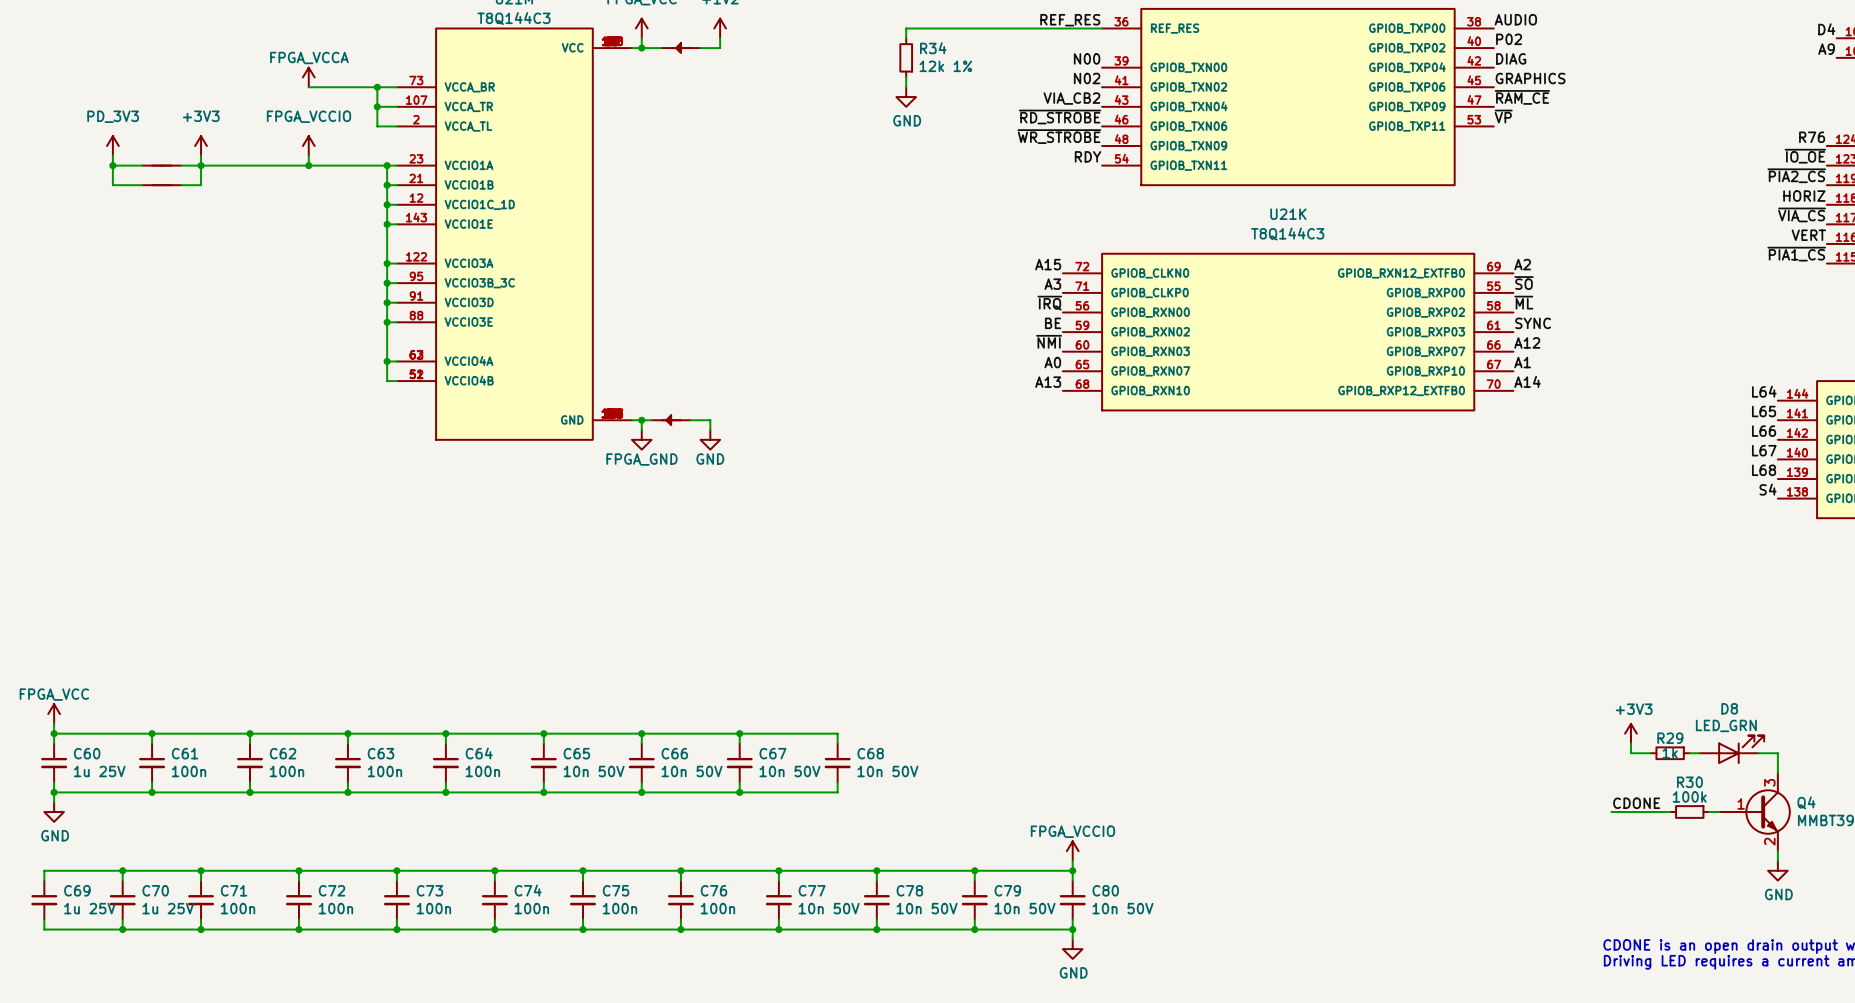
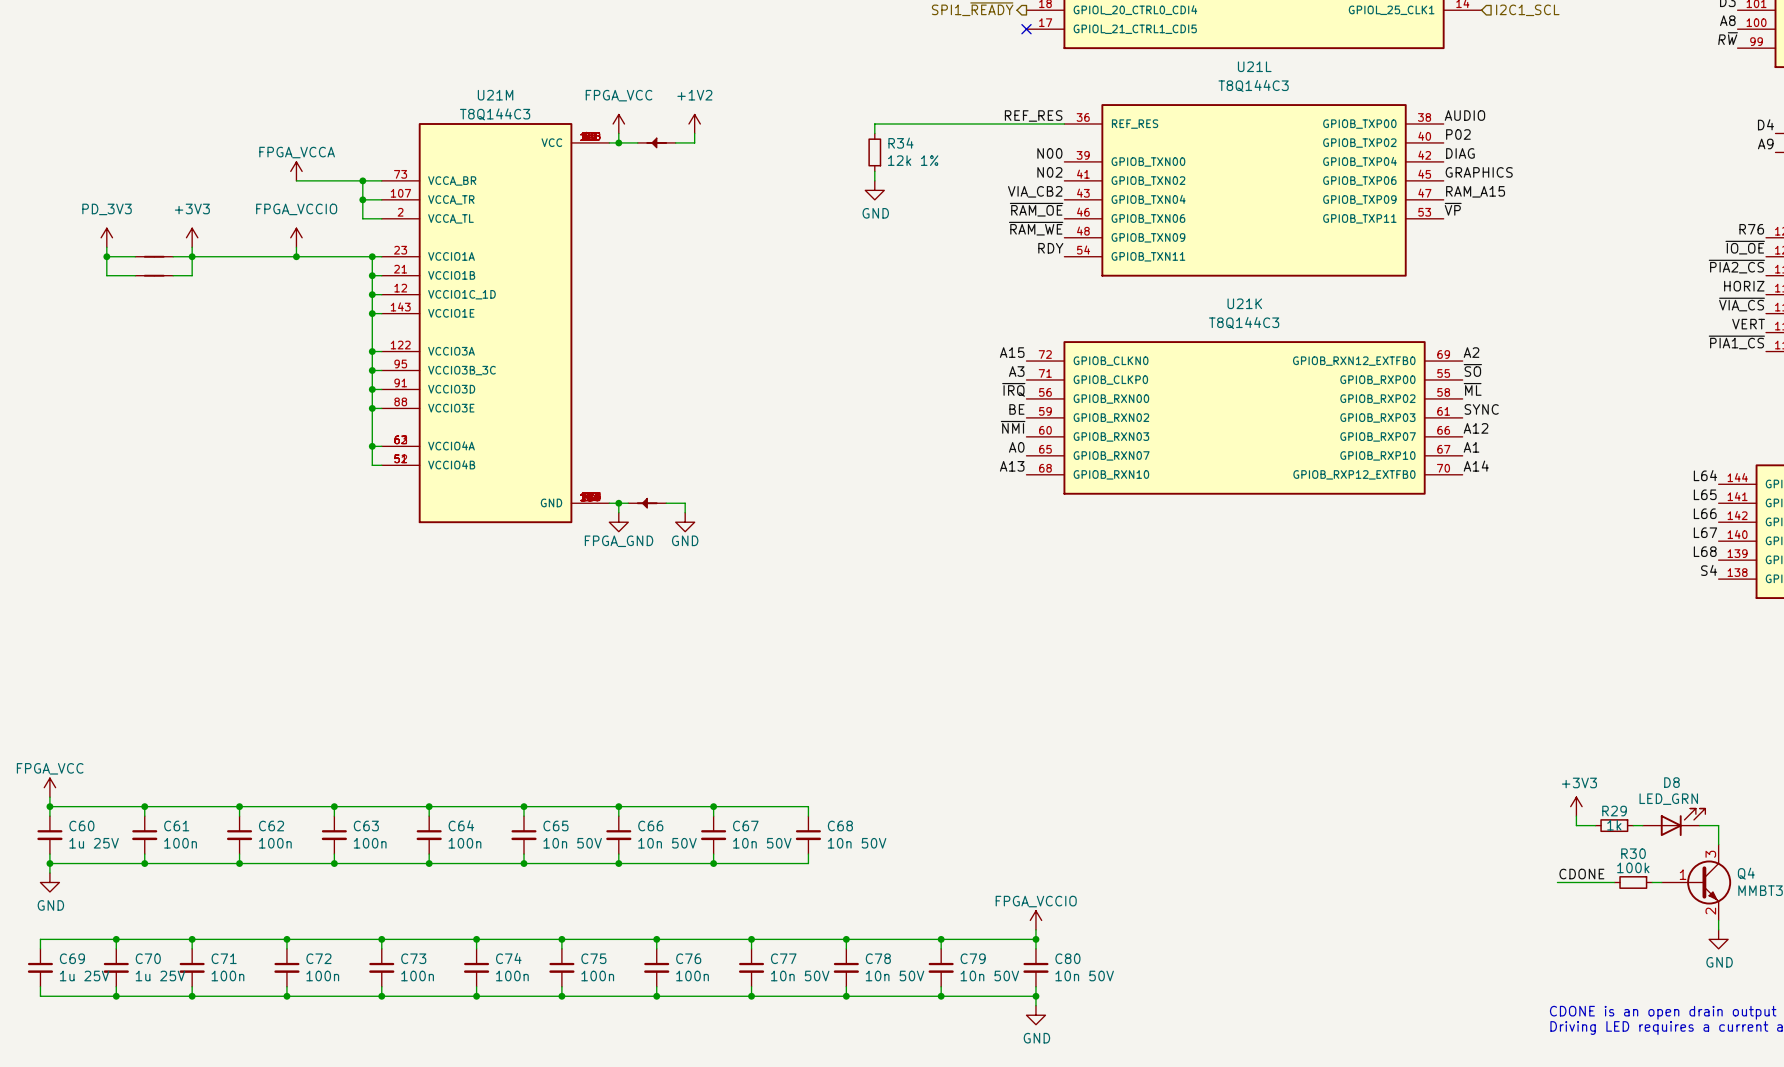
label: ~{RAM_CE} (1522, 97) -> RAM_A15 (1475, 191)
label: ~{RD_STROBE} (1060, 117) -> ~{RAM_OE} (1036, 209)
label: ~{WR_STROBE} (1059, 136) -> ~{RAM_WE} (1036, 228)

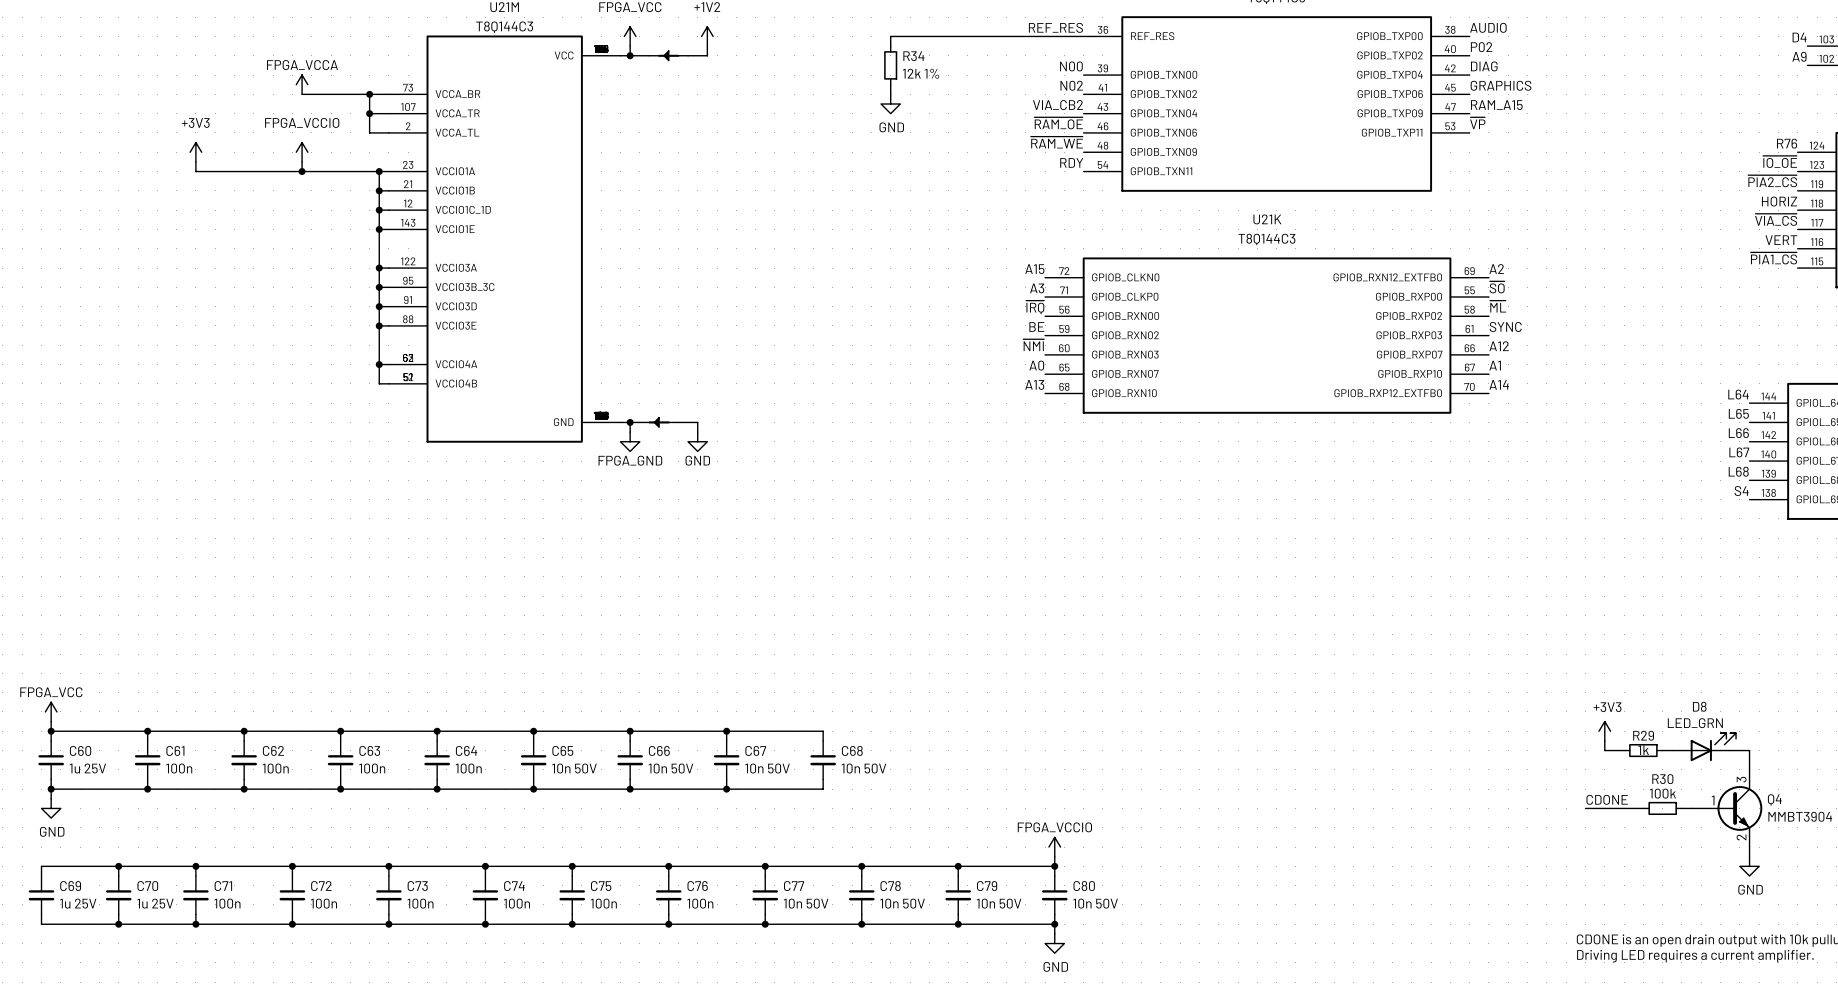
power symbol: PD_3V3 (106, 237) -> none
wire: (106, 247) (106, 275) (135, 275) -> none
wire: (106, 256) (135, 256) -> none
junction: (106, 256) -> none
part: (154, 256) -> none
wire: (173, 256) (192, 256) (192, 275) (173, 275) -> none
junction: (192, 256) -> none
part: (154, 275) -> none

